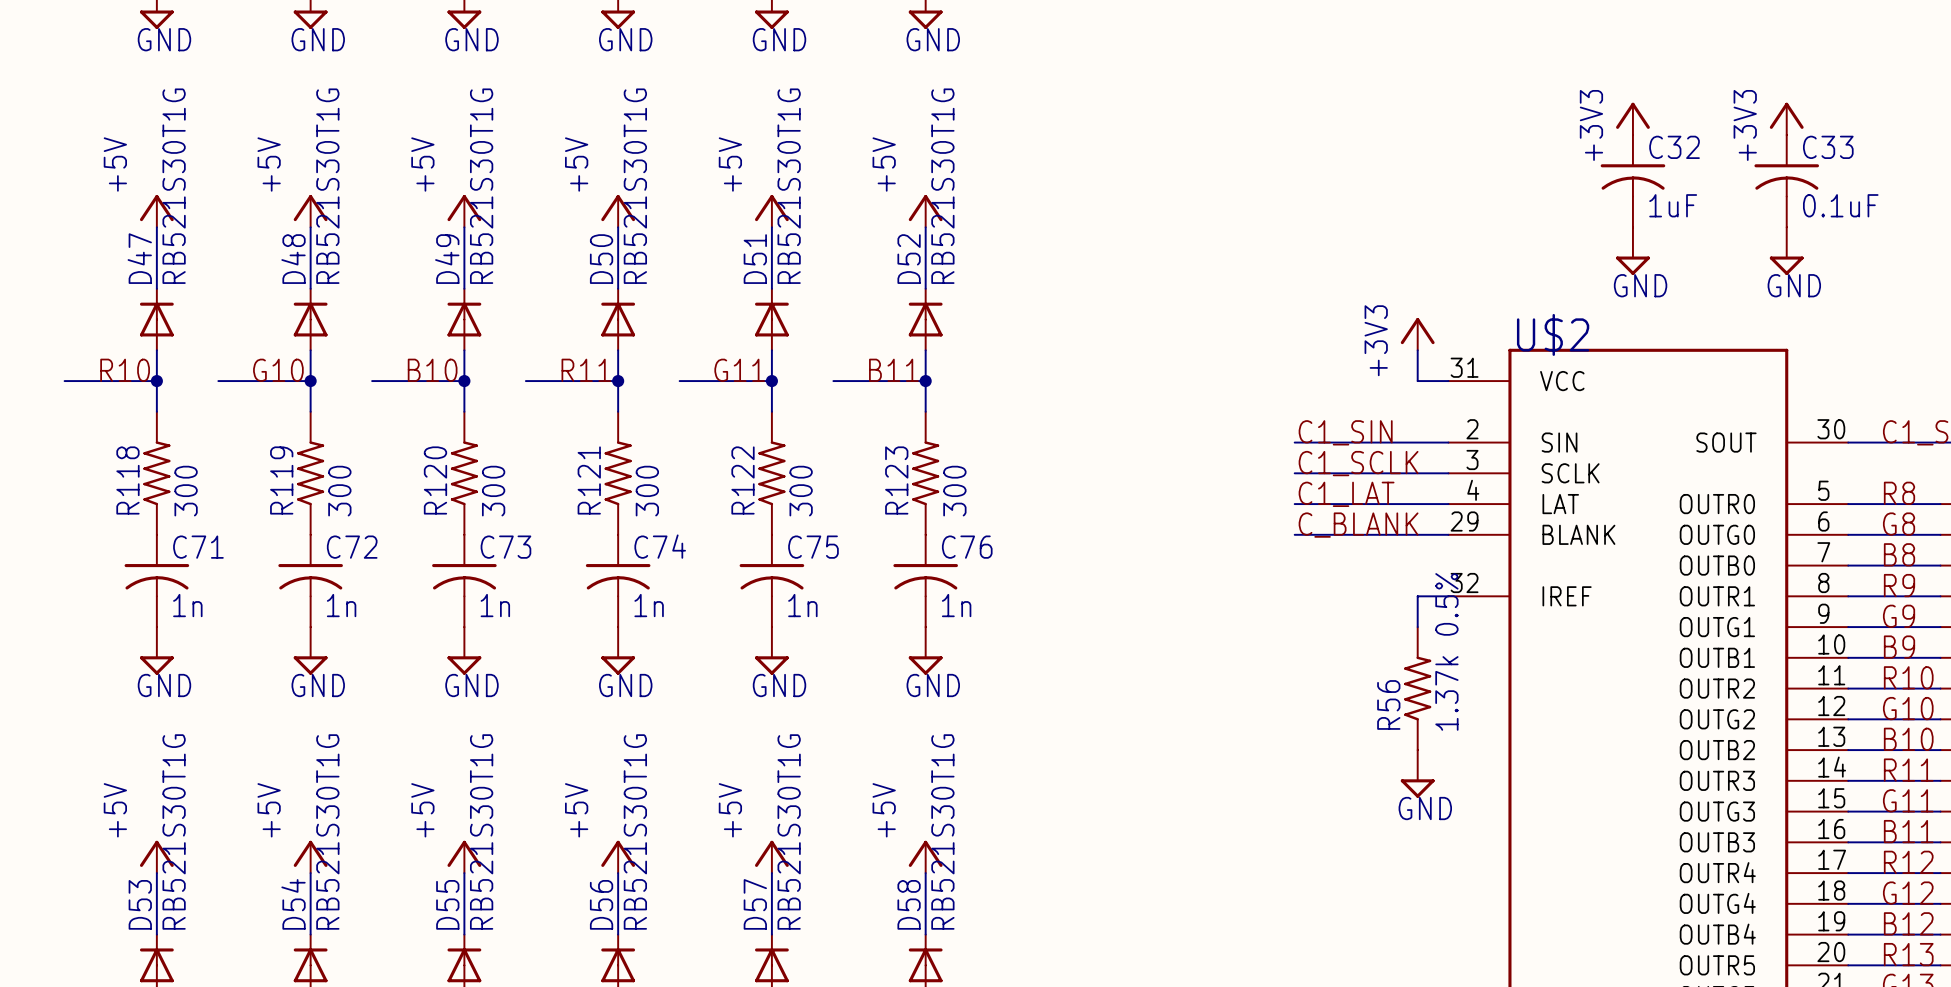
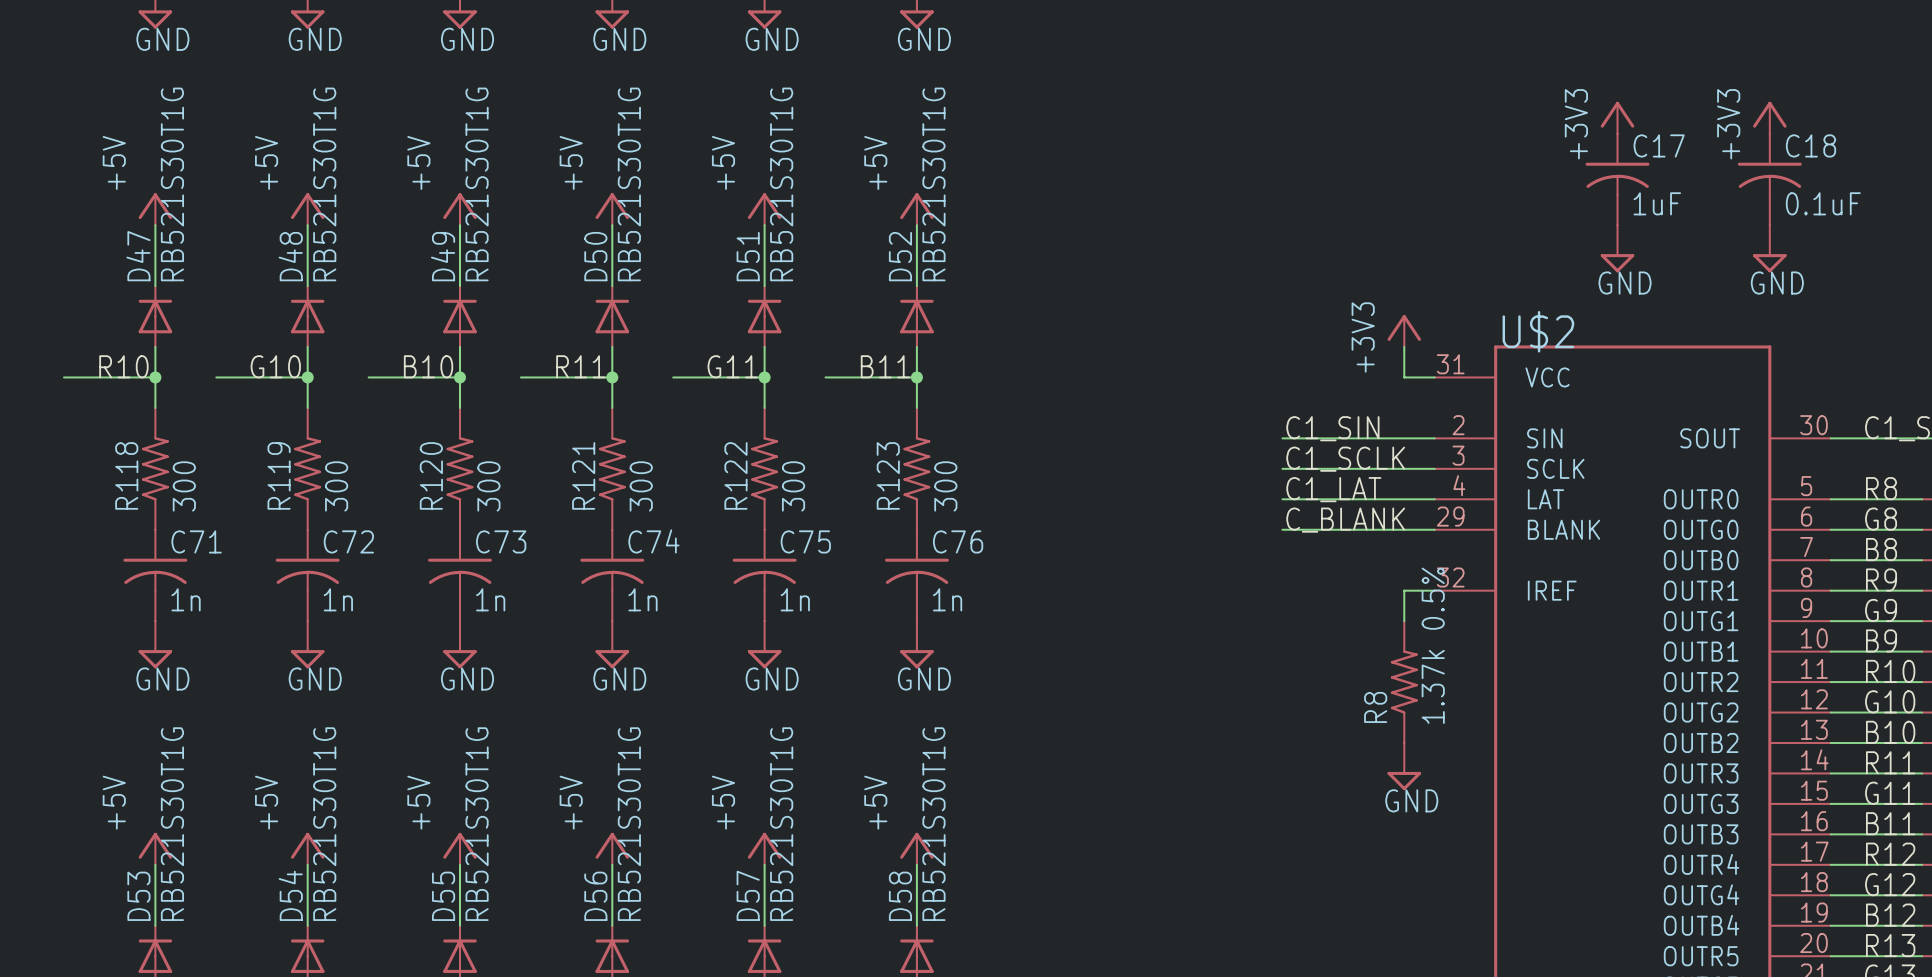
C32 name: C32 (1674, 147) -> C17 (1659, 145)
C33 name: C33 (1828, 147) -> C18 (1810, 145)
R56 name: R56 (1388, 704) -> R8 (1375, 707)

